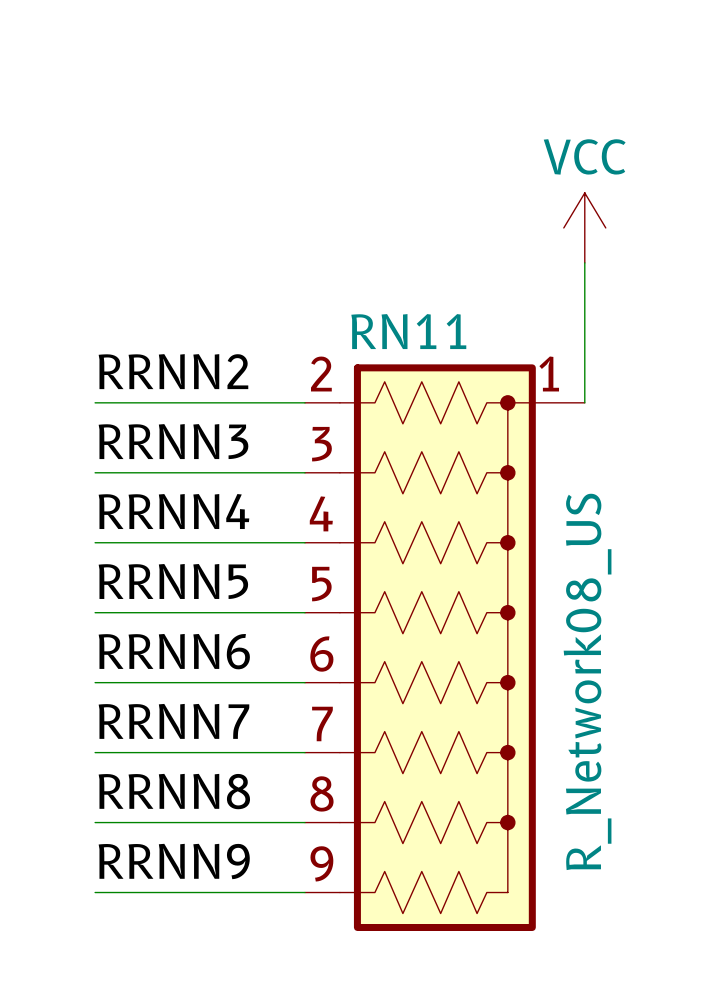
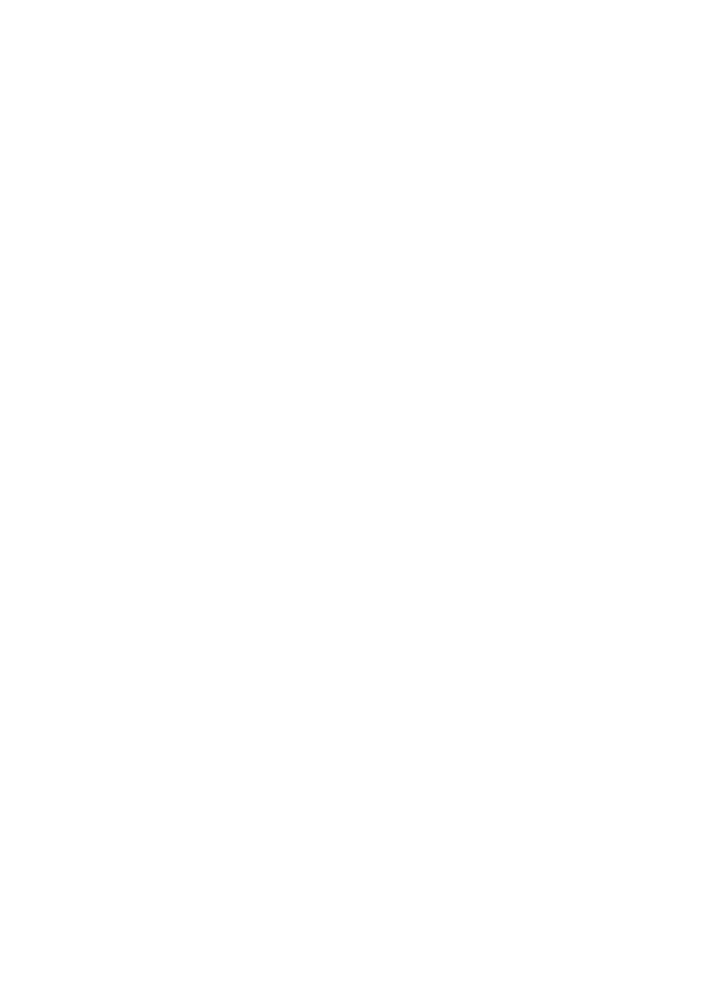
power symbol: VCC (584, 227) -> none
wire: (584, 262) (584, 402) -> none
label: RRNN2 (173, 371) -> none
wire: (95, 402) (304, 402) -> none
label: RRNN3 (173, 441) -> none
wire: (95, 472) (304, 472) -> none
label: RRNN4 (173, 511) -> none
wire: (95, 542) (304, 542) -> none
label: RRNN5 (173, 581) -> none
wire: (95, 612) (304, 612) -> none
RN11: R_Network08_US (444, 647) -> none
label: RRNN6 (174, 651) -> none
wire: (95, 682) (304, 682) -> none
label: RRNN7 (173, 721) -> none
wire: (95, 752) (304, 752) -> none
label: RRNN8 (174, 791) -> none
wire: (95, 822) (304, 822) -> none
label: RRNN9 (174, 861) -> none
wire: (95, 892) (304, 892) -> none

